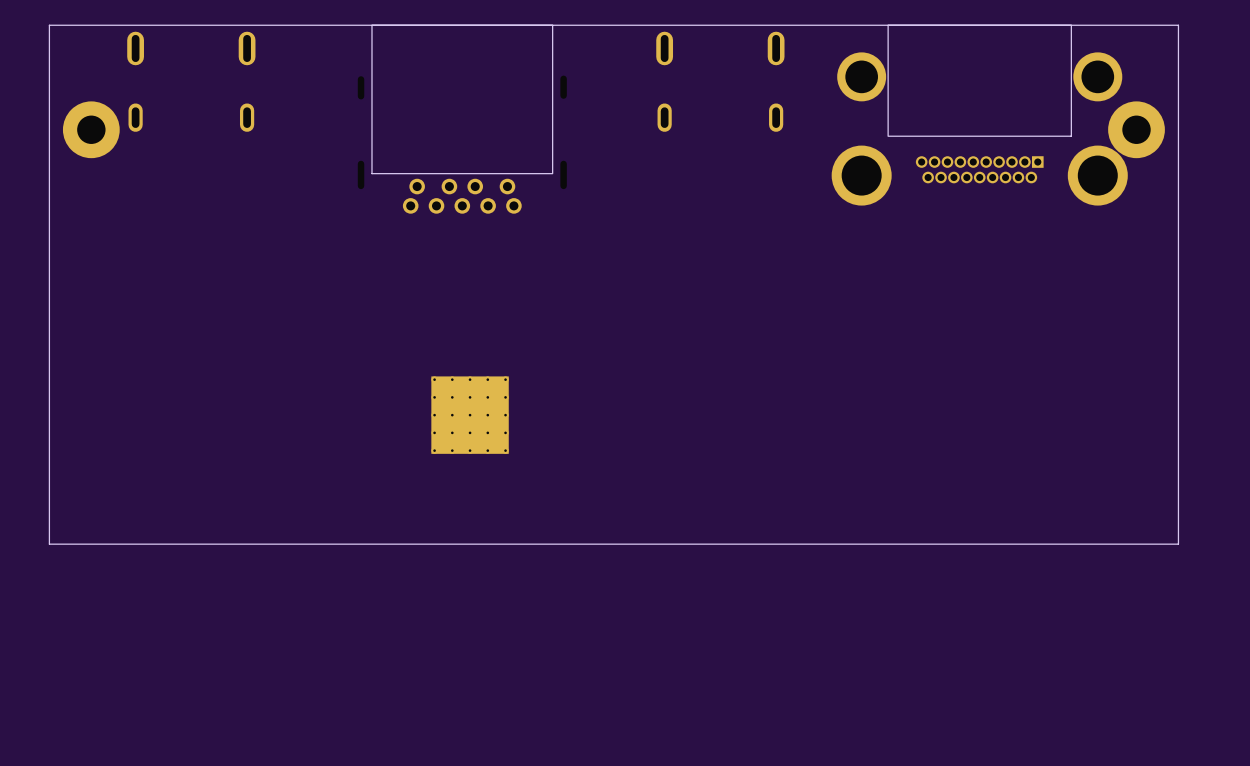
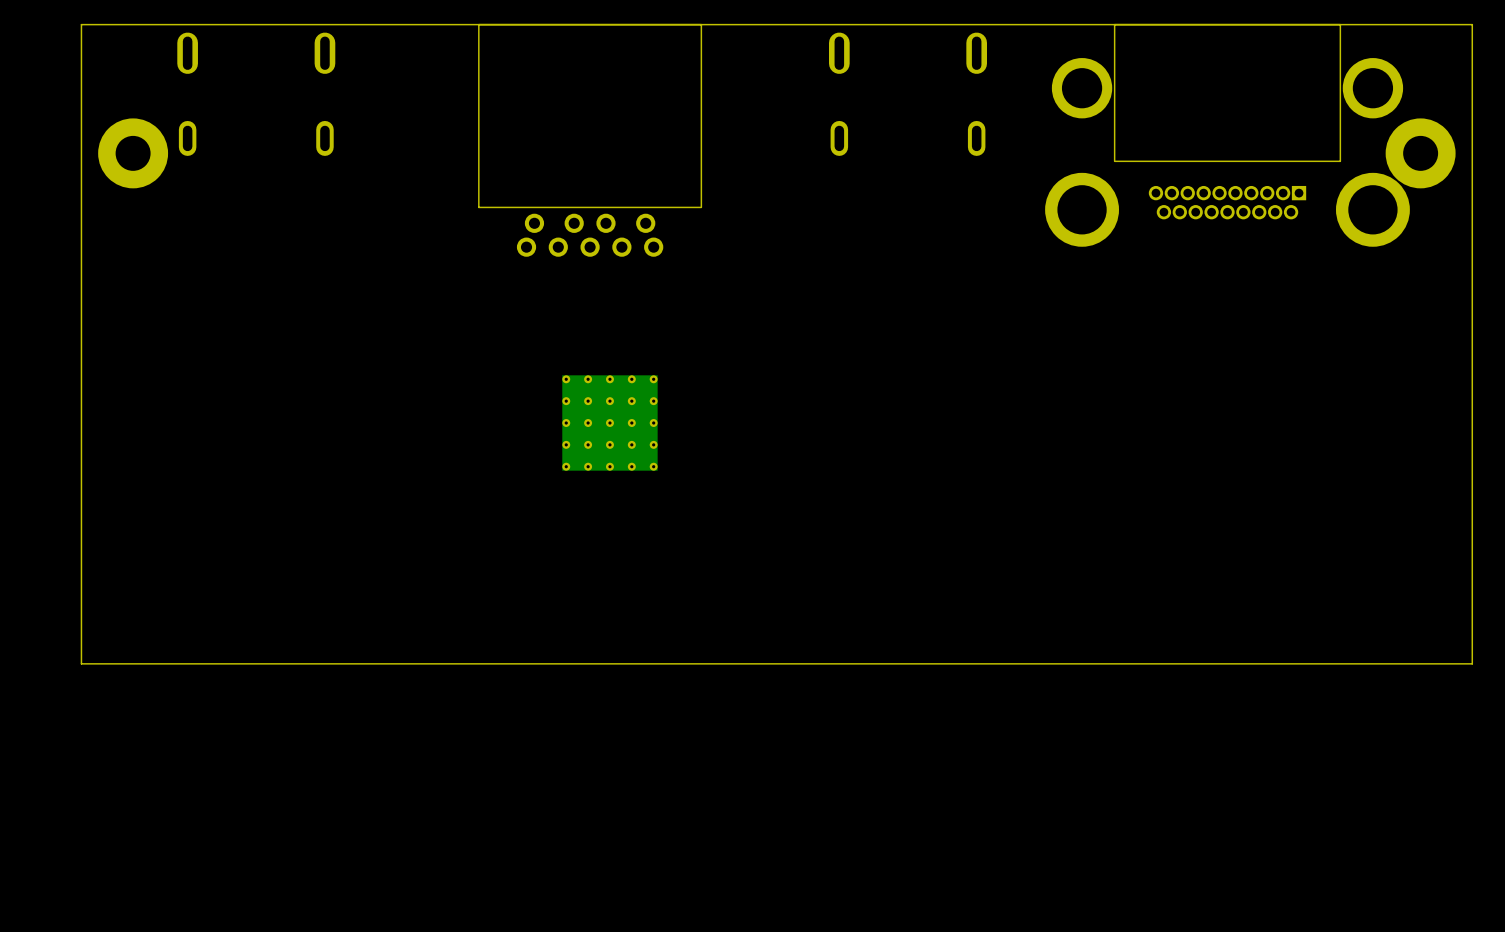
part position: (470, 415) -> (609, 423)

